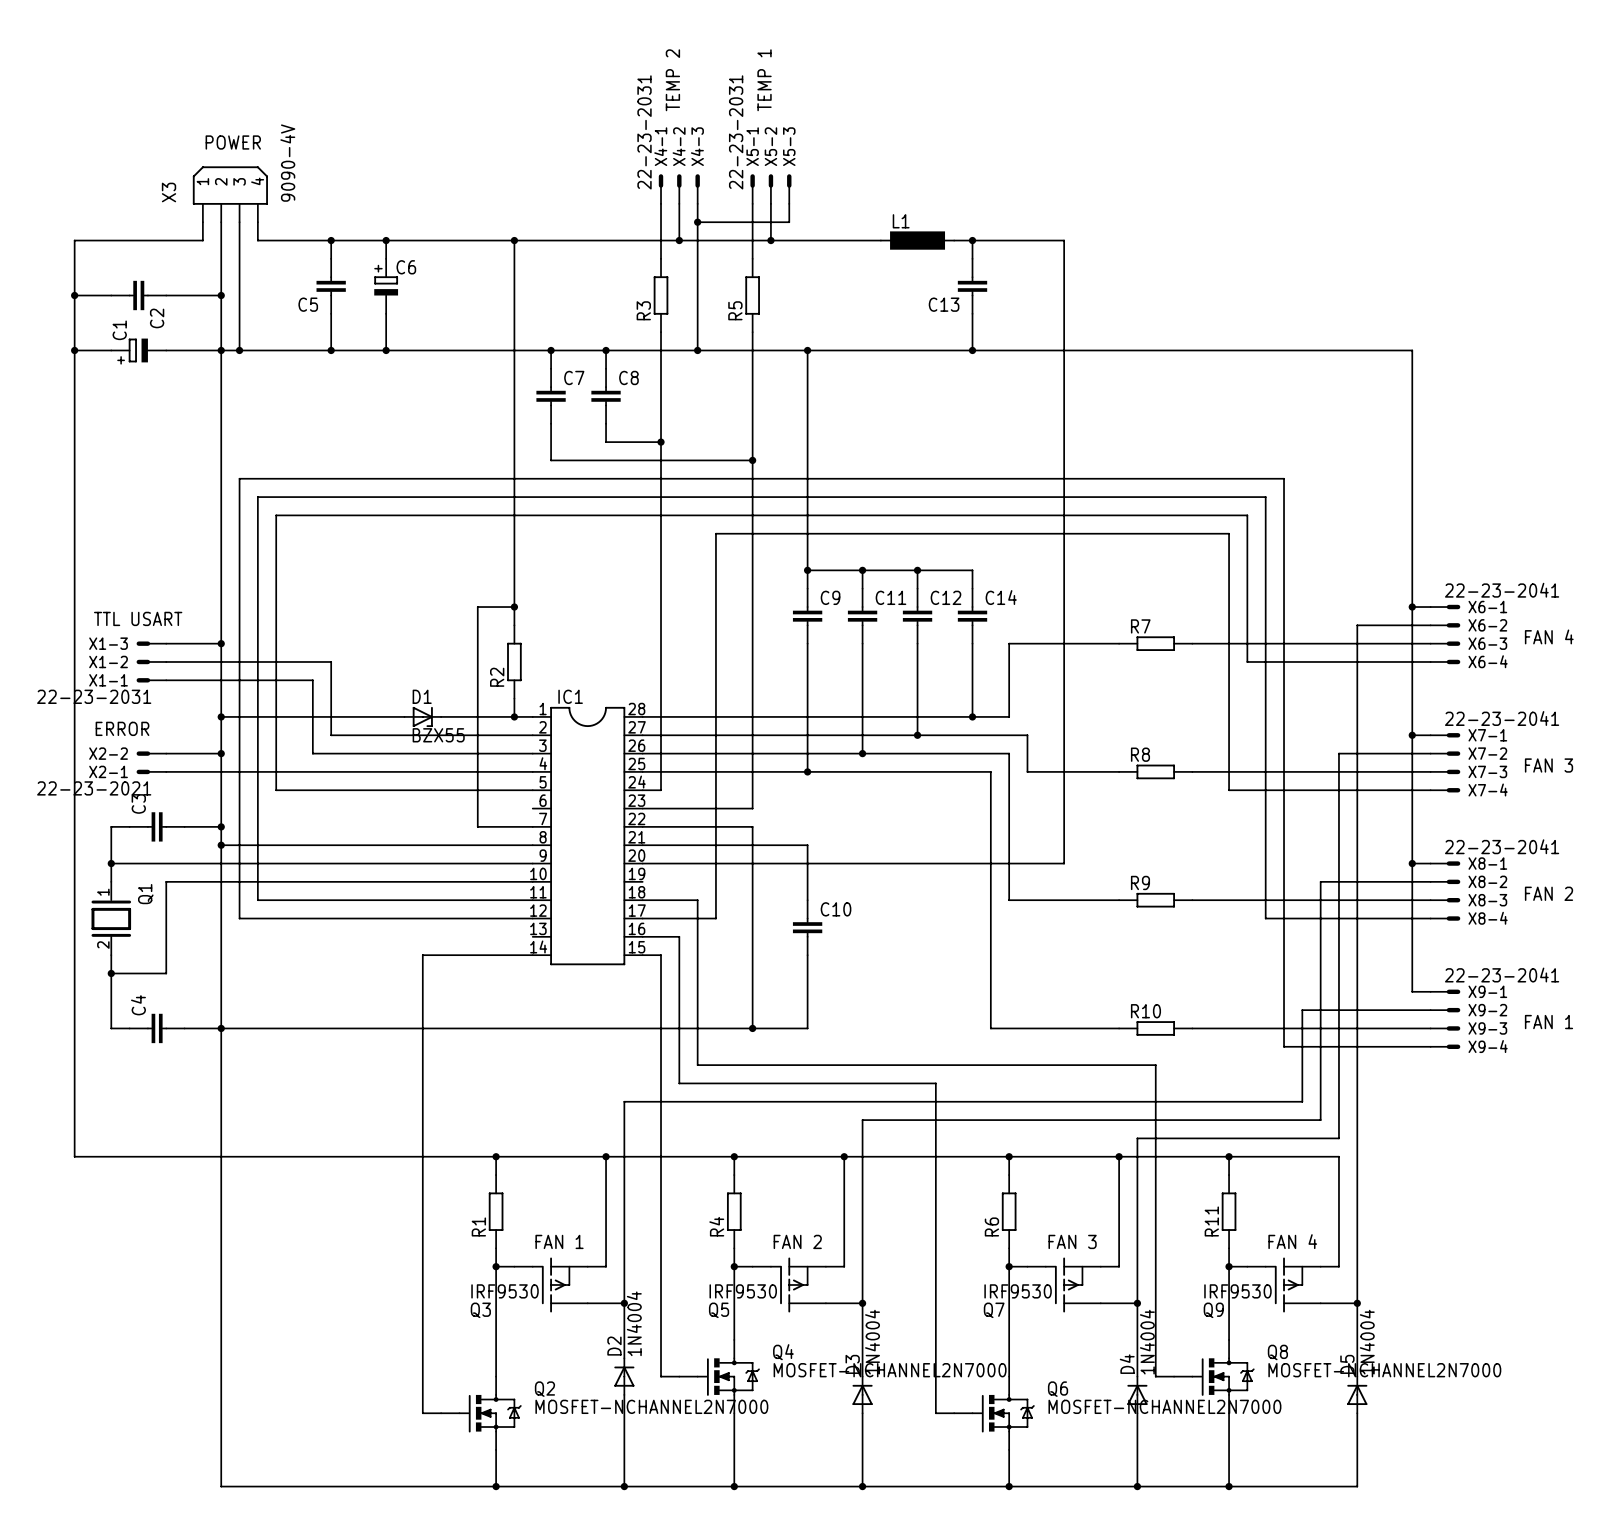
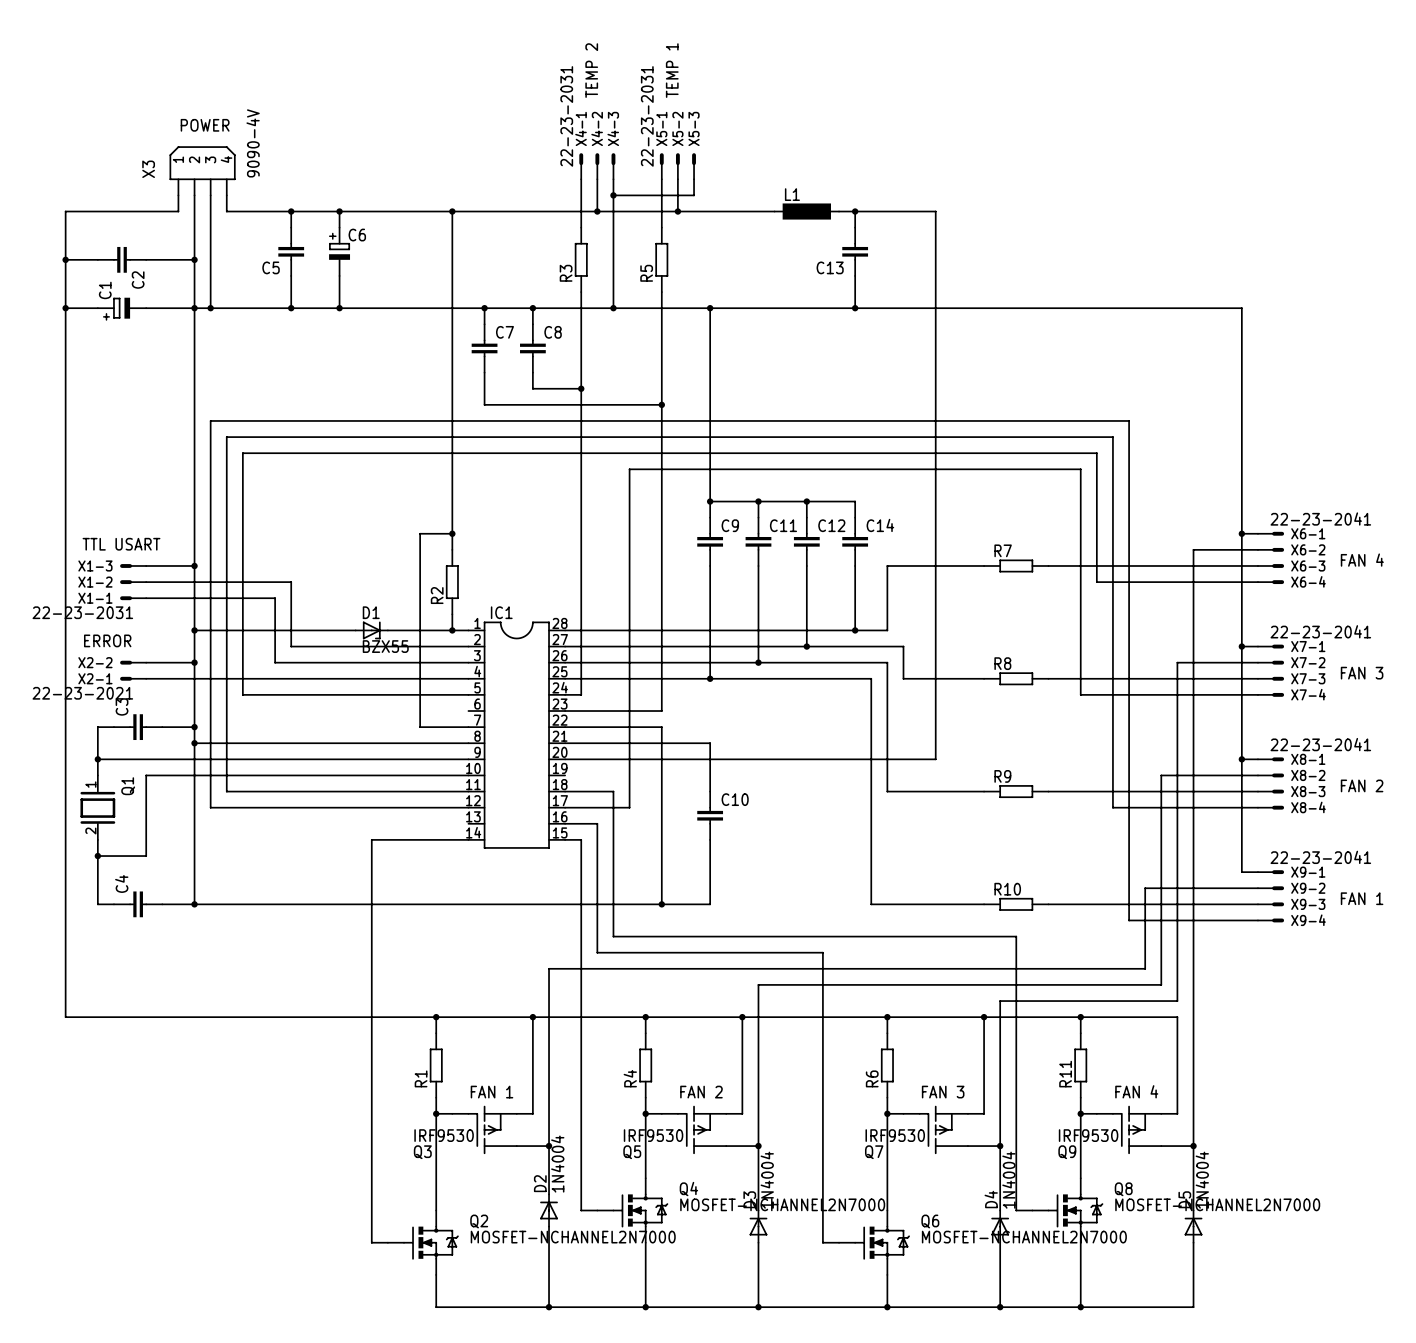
wire: (221, 1028) (221, 1486) (496, 1486) -> none
junction: (496, 1486) -> none

